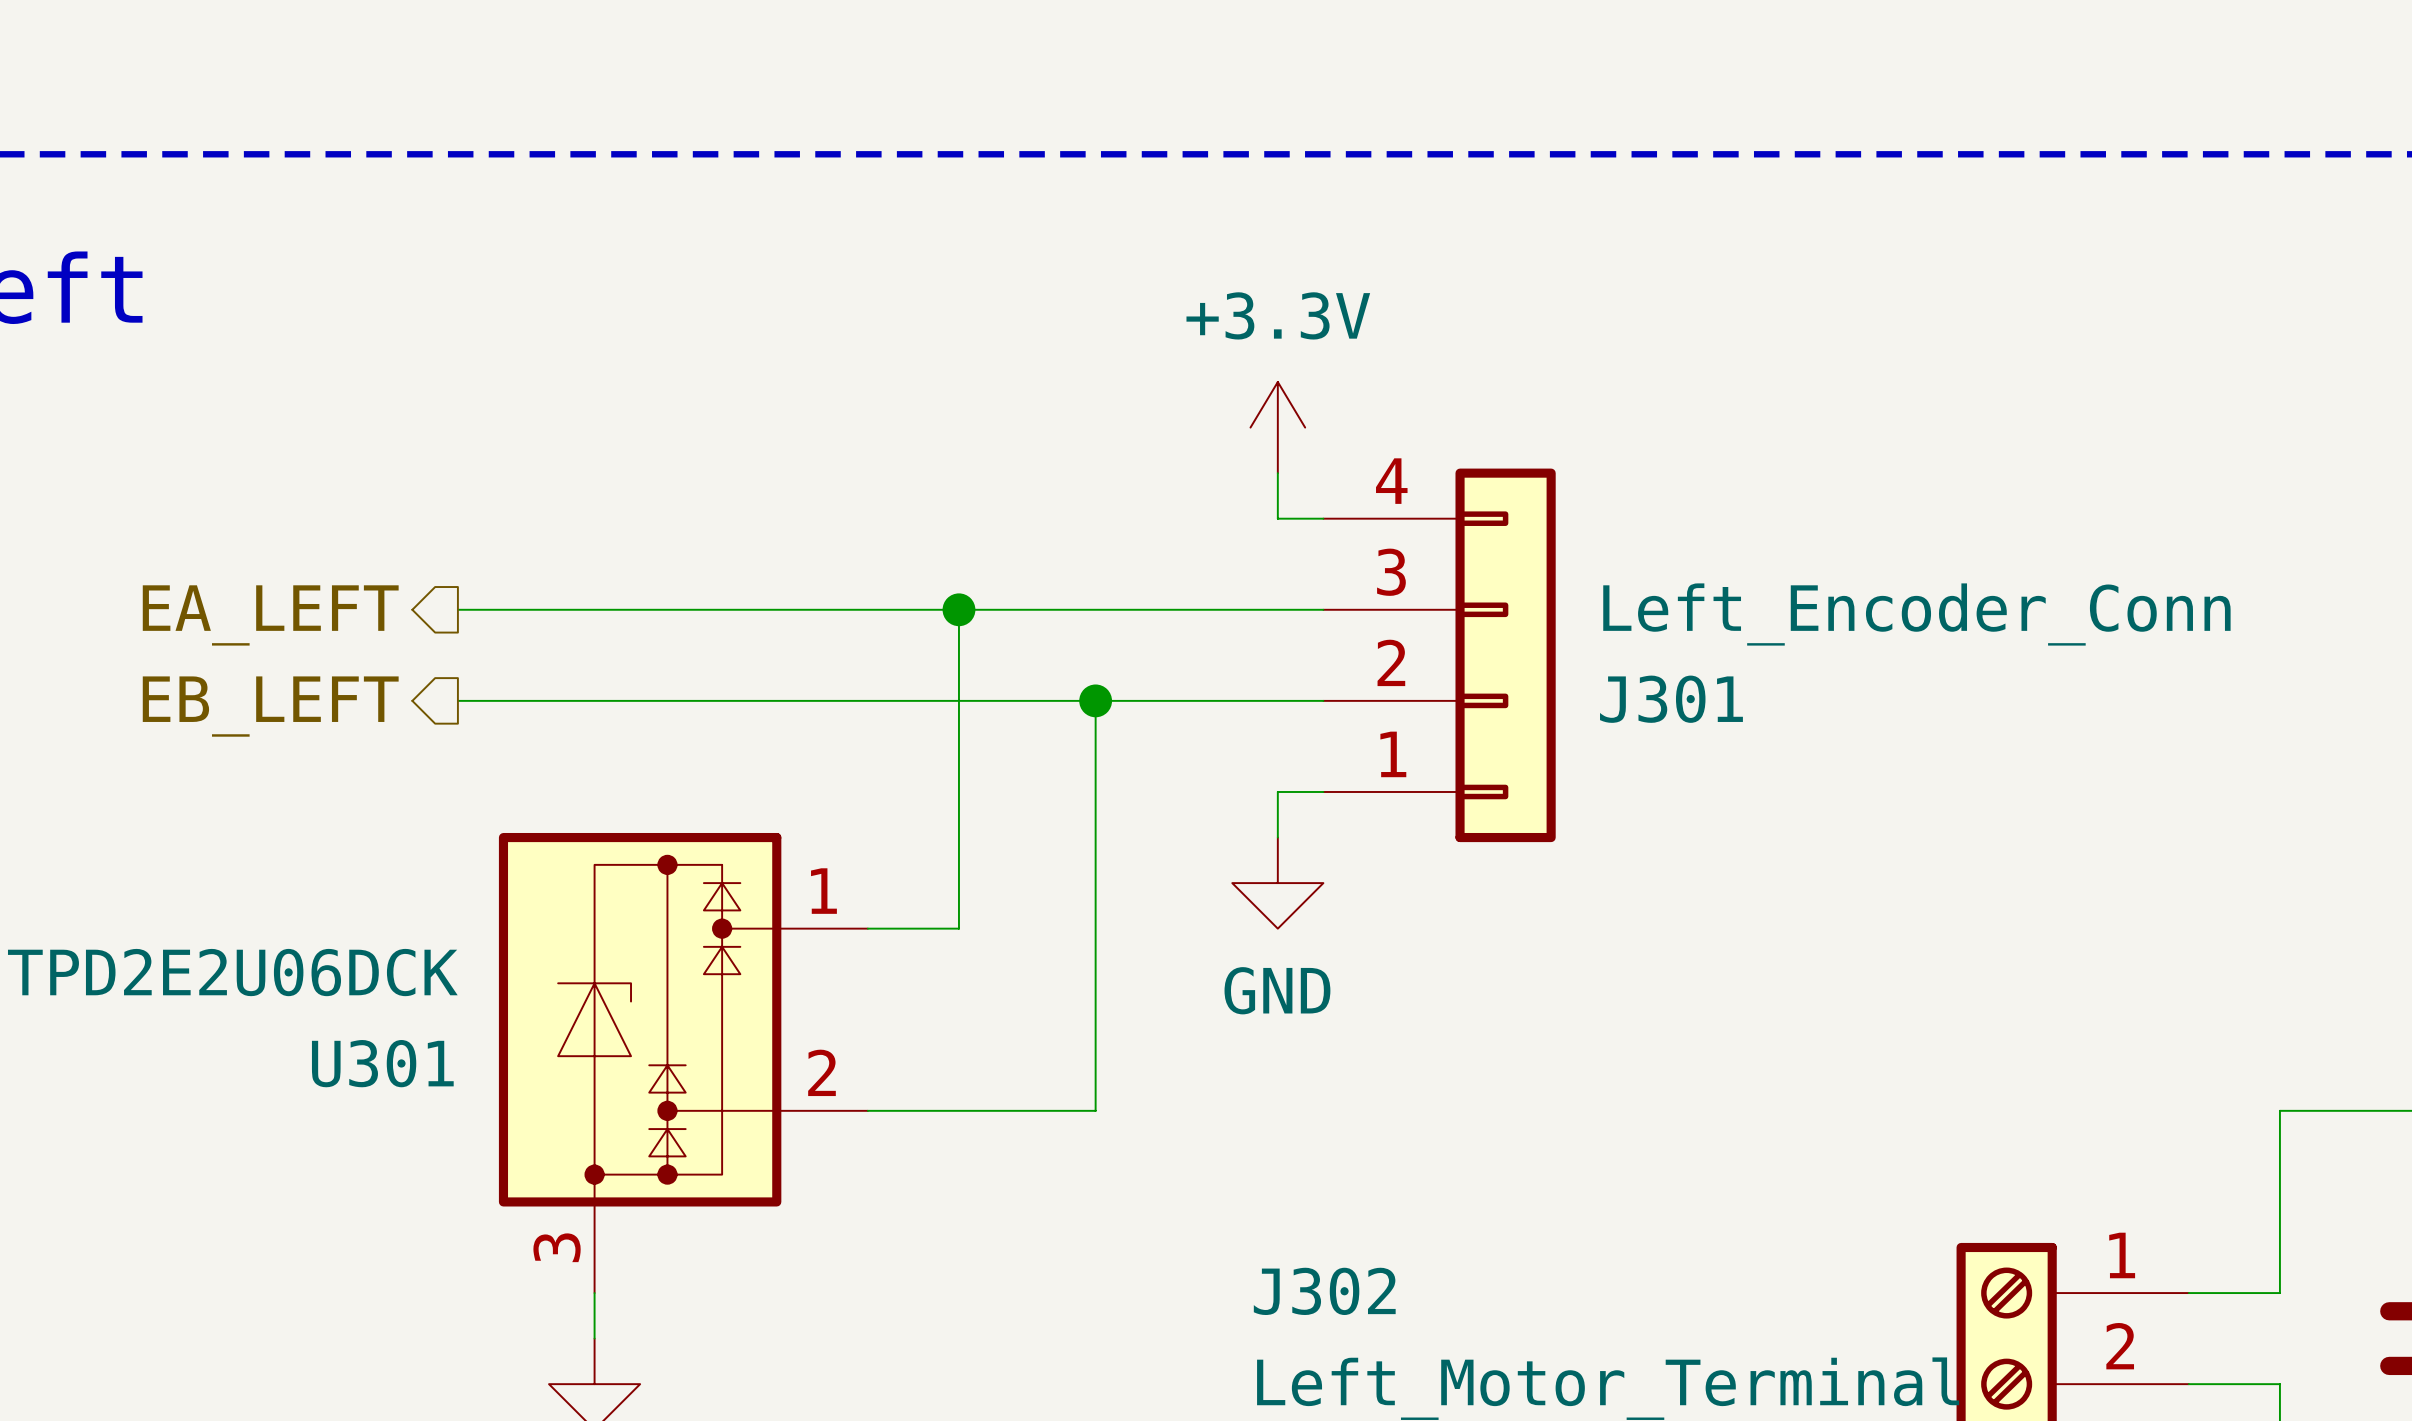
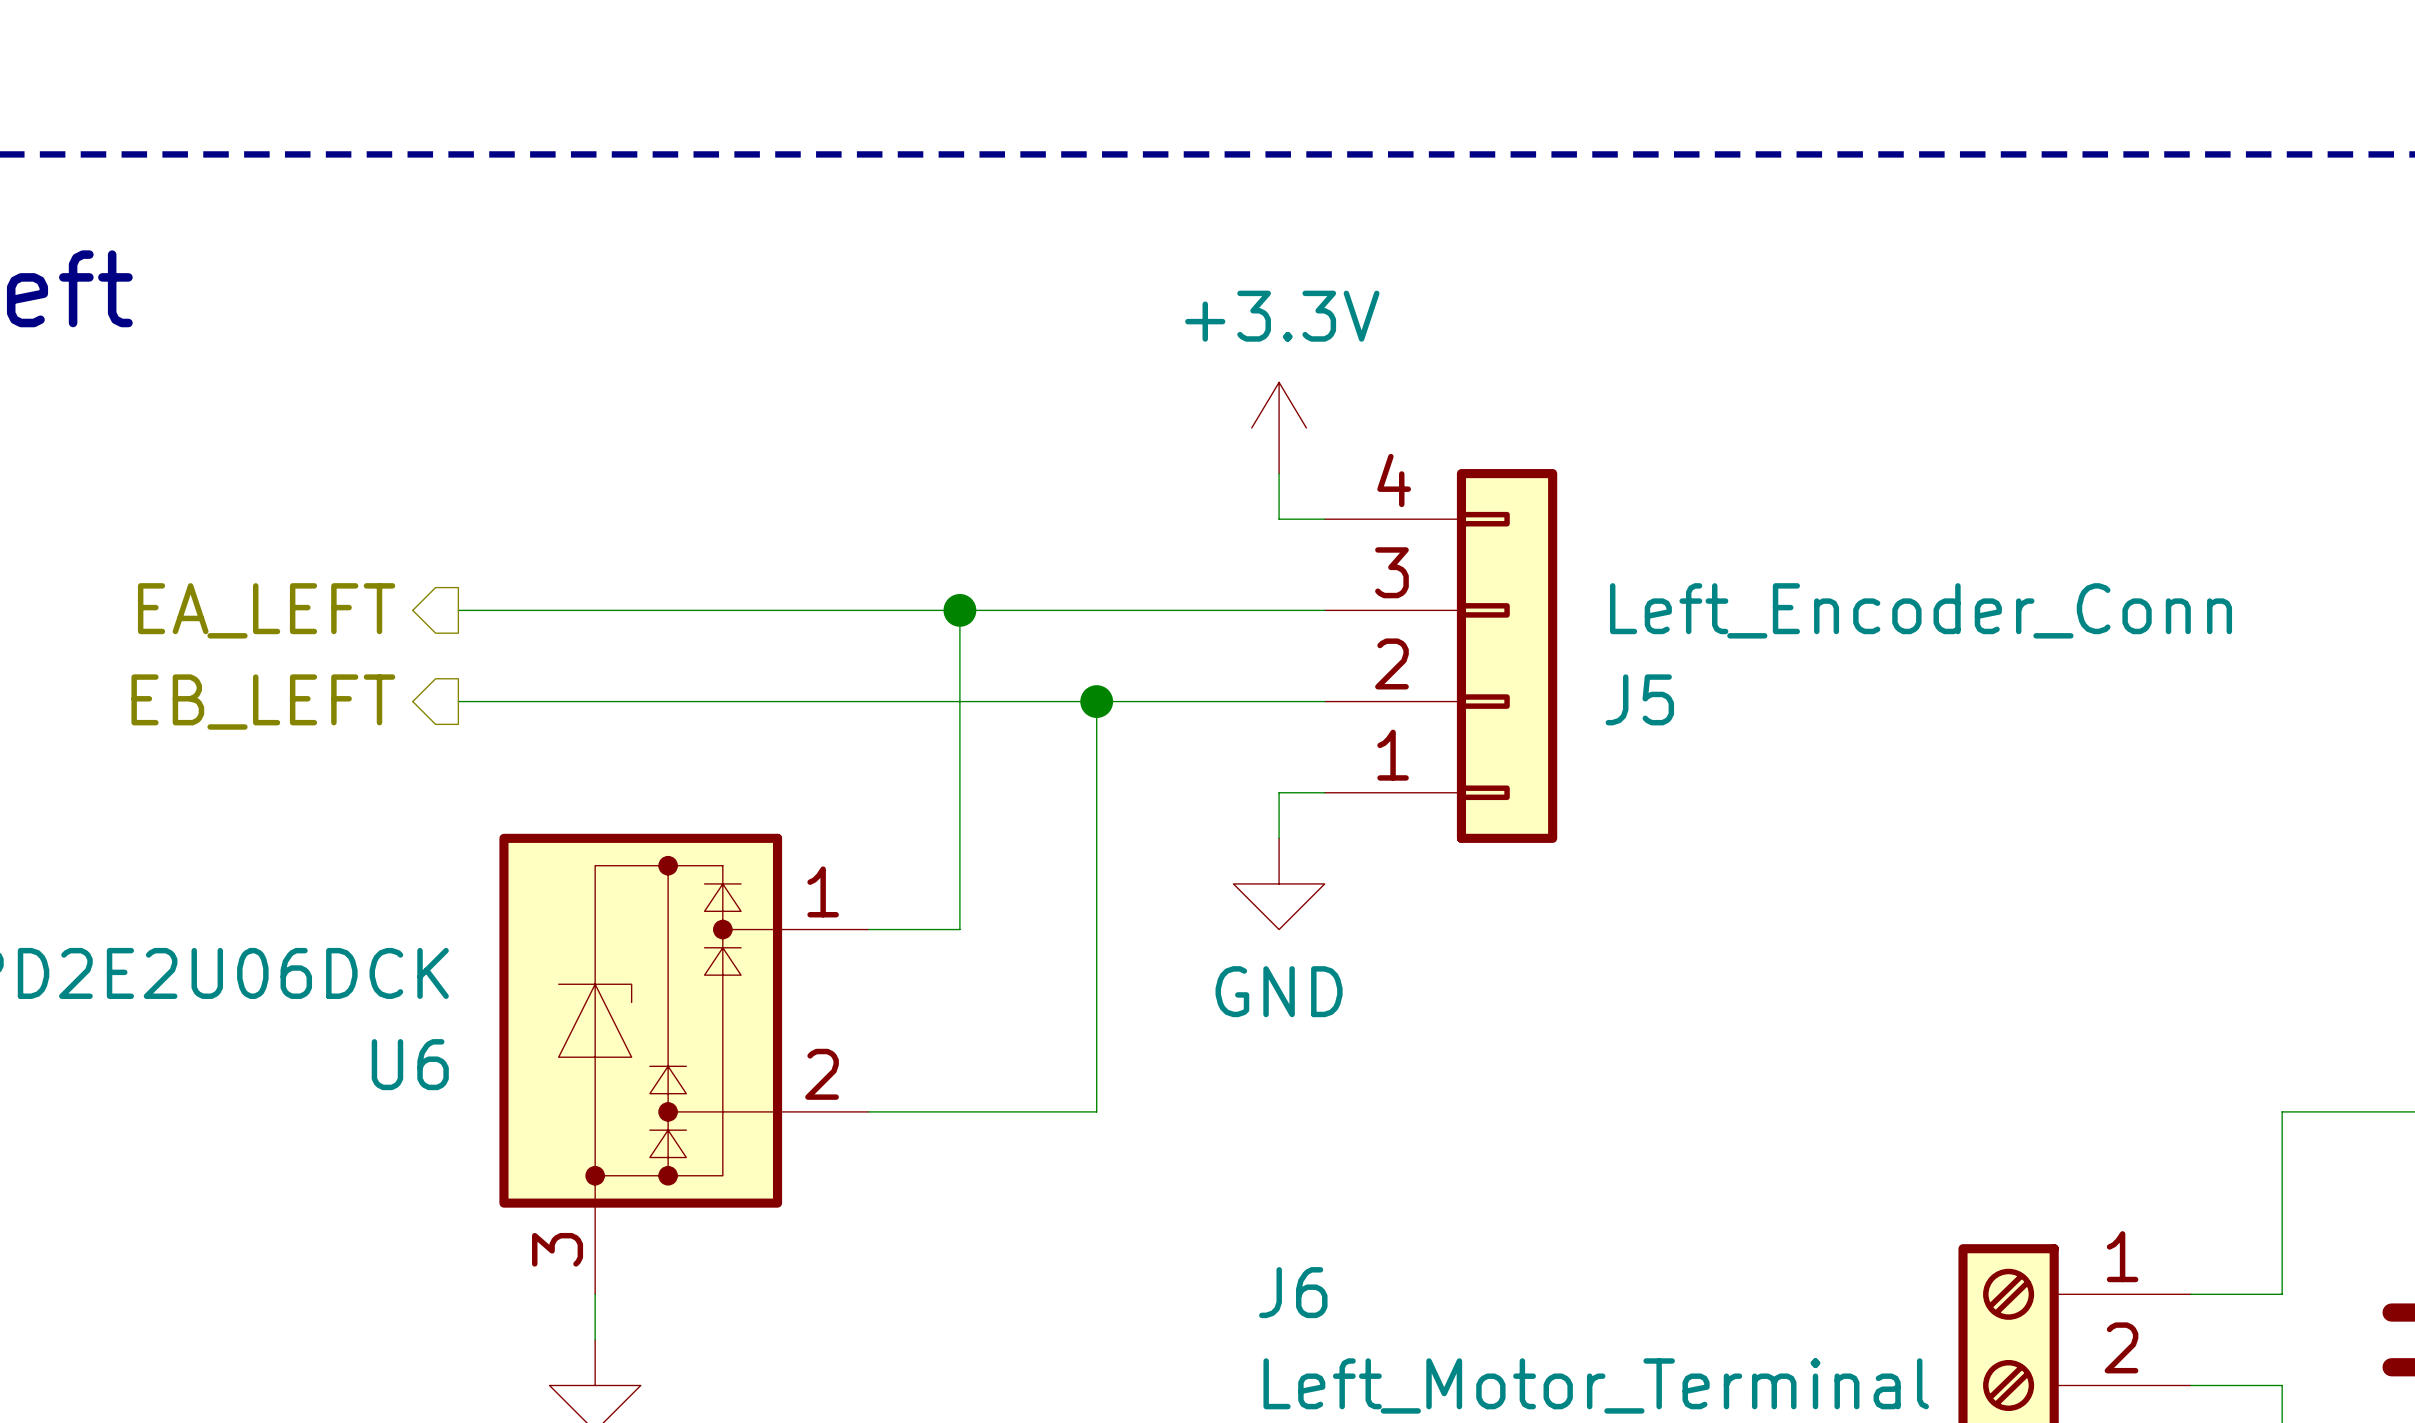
J301 name: J301 (1671, 699) -> J5 (1639, 699)
U301 name: U301 (382, 1063) -> U6 (410, 1064)
J302 name: J302 (1324, 1291) -> J6 (1293, 1292)

